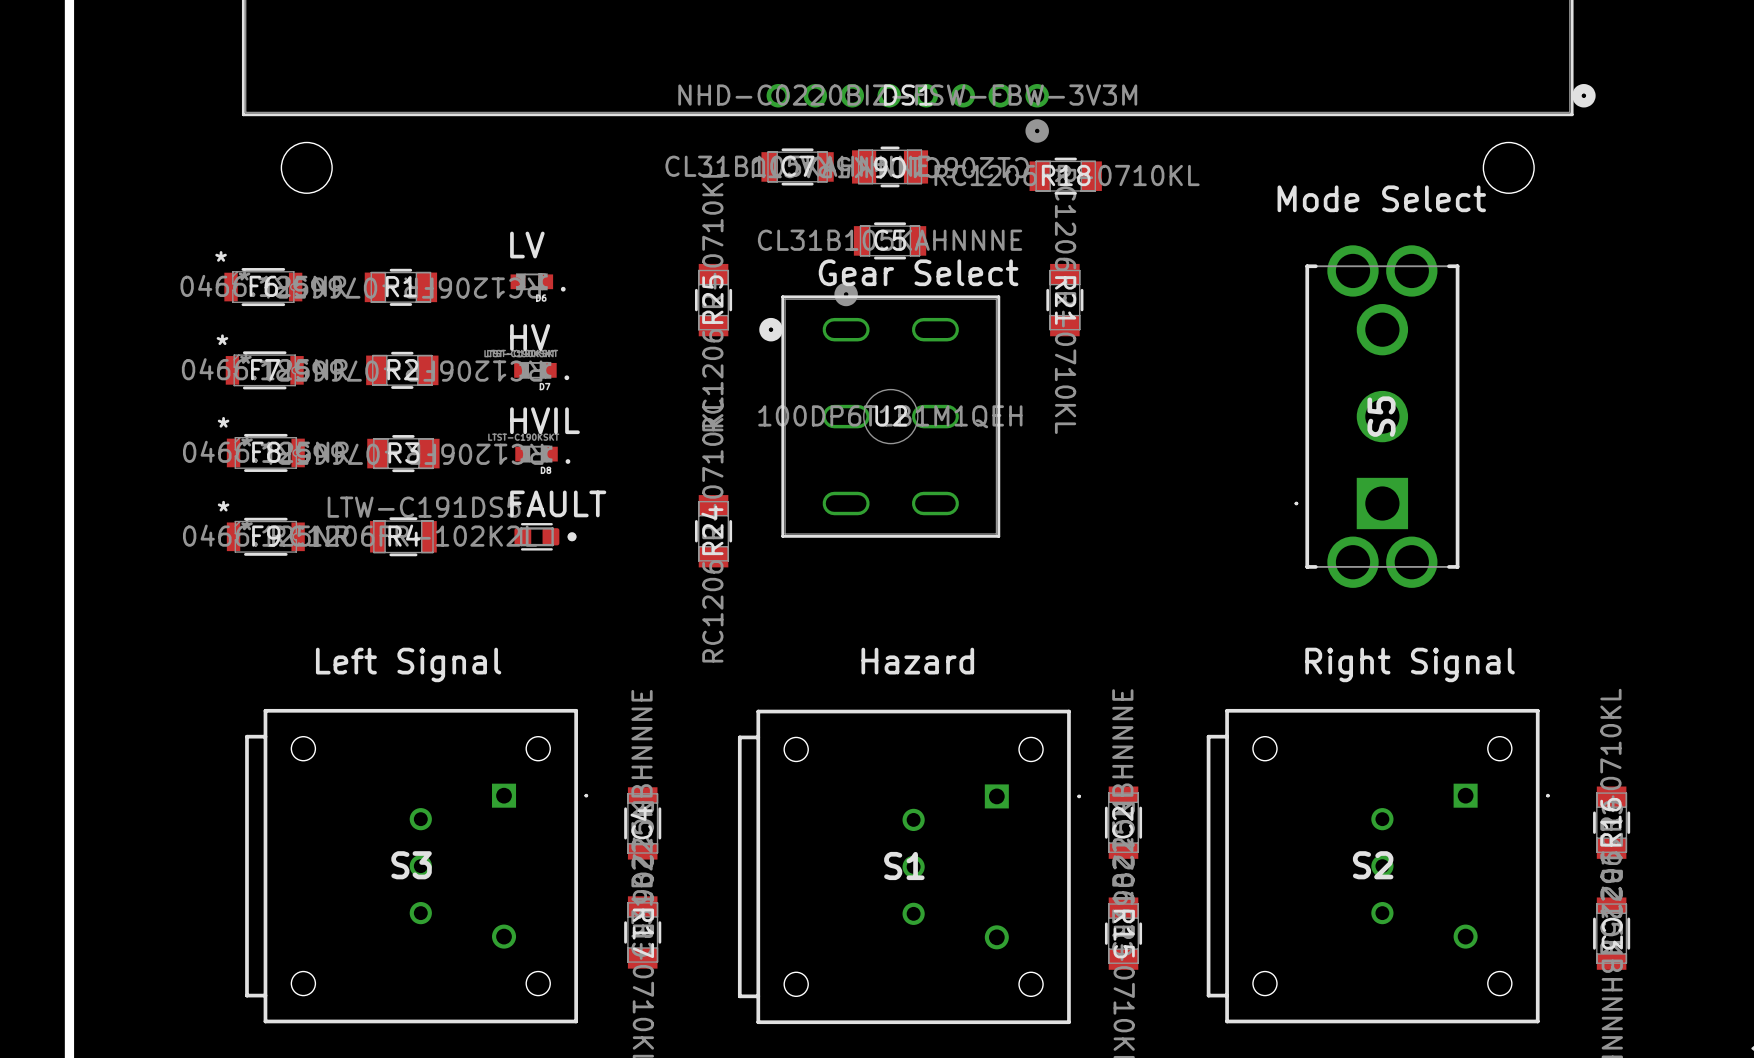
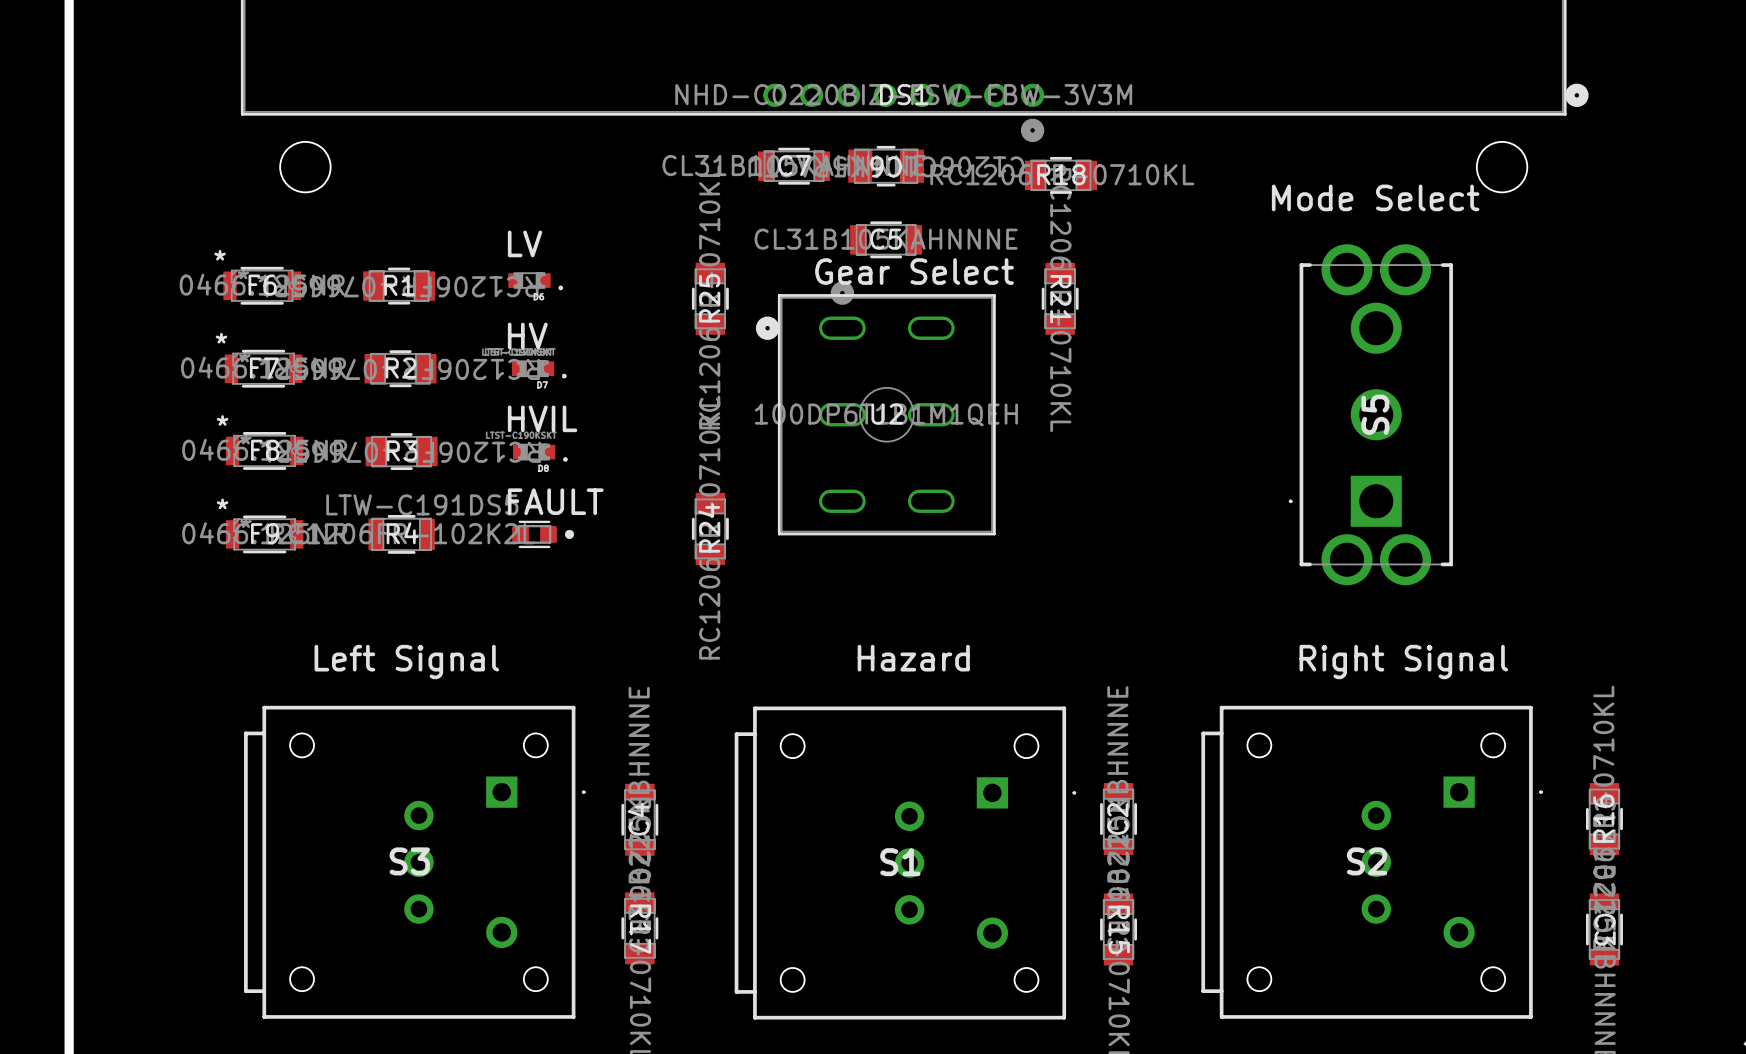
S3 footprint: [245, 708, 589, 1024] -> [244, 705, 586, 1019]
S2 footprint: [1206, 708, 1550, 1024] -> [1201, 705, 1543, 1019]
S1 footprint: [737, 709, 1081, 1025] -> [734, 706, 1077, 1020]

